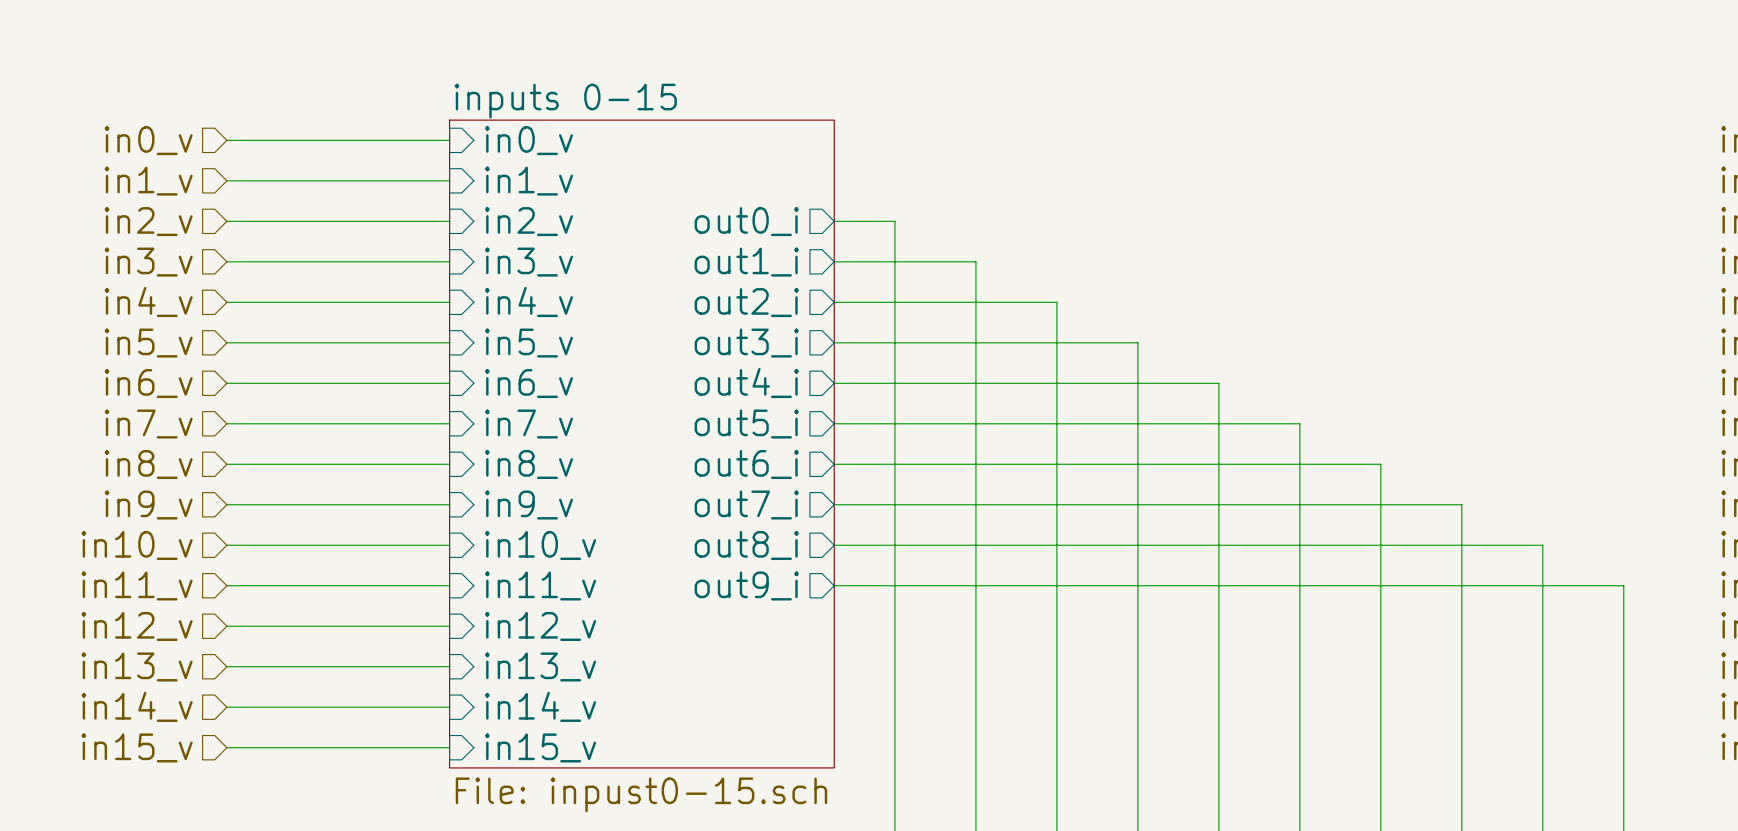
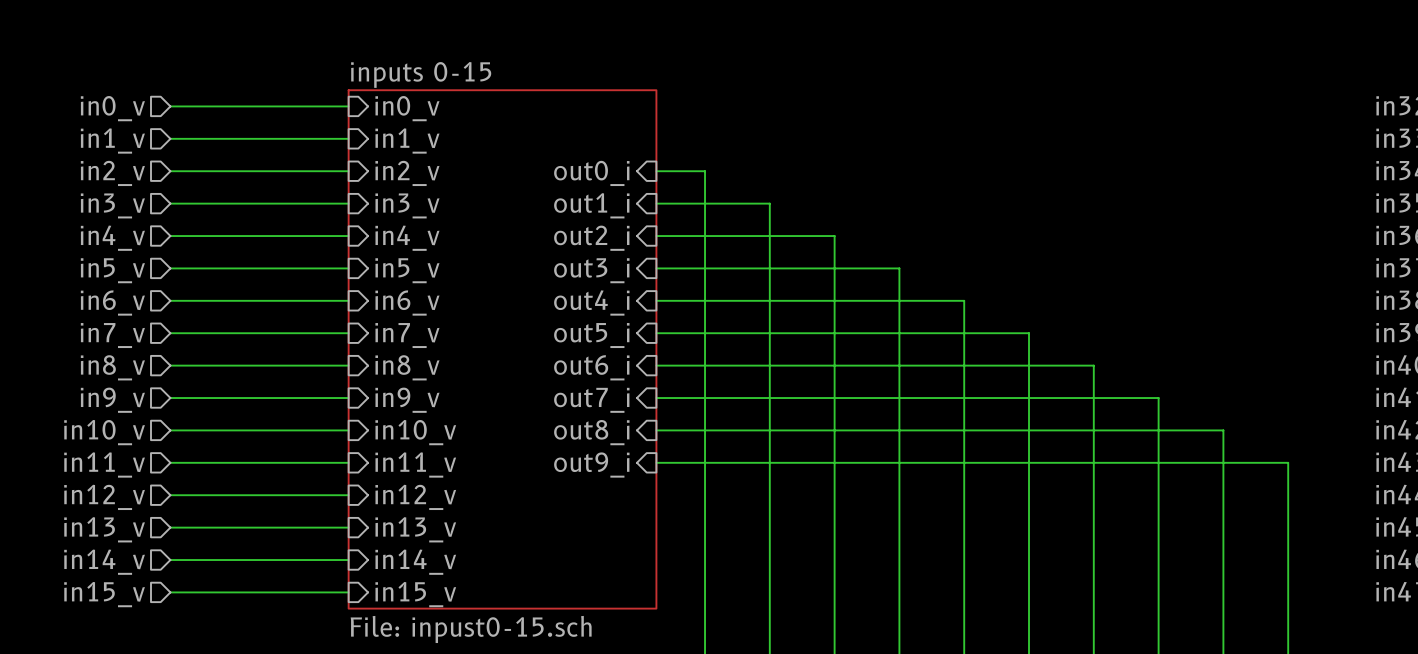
sheet pin shape: output (746, 221) -> input (591, 173)
sheet pin shape: output (746, 262) -> input (591, 205)
sheet pin shape: output (746, 302) -> input (591, 238)
sheet pin shape: output (746, 343) -> input (591, 270)
sheet pin shape: output (746, 382) -> input (591, 303)
sheet pin shape: output (746, 424) -> input (591, 335)
sheet pin shape: output (746, 464) -> input (591, 367)
sheet pin shape: output (746, 505) -> input (591, 400)
sheet pin shape: output (746, 545) -> input (591, 432)
sheet pin shape: output (746, 585) -> input (591, 465)

